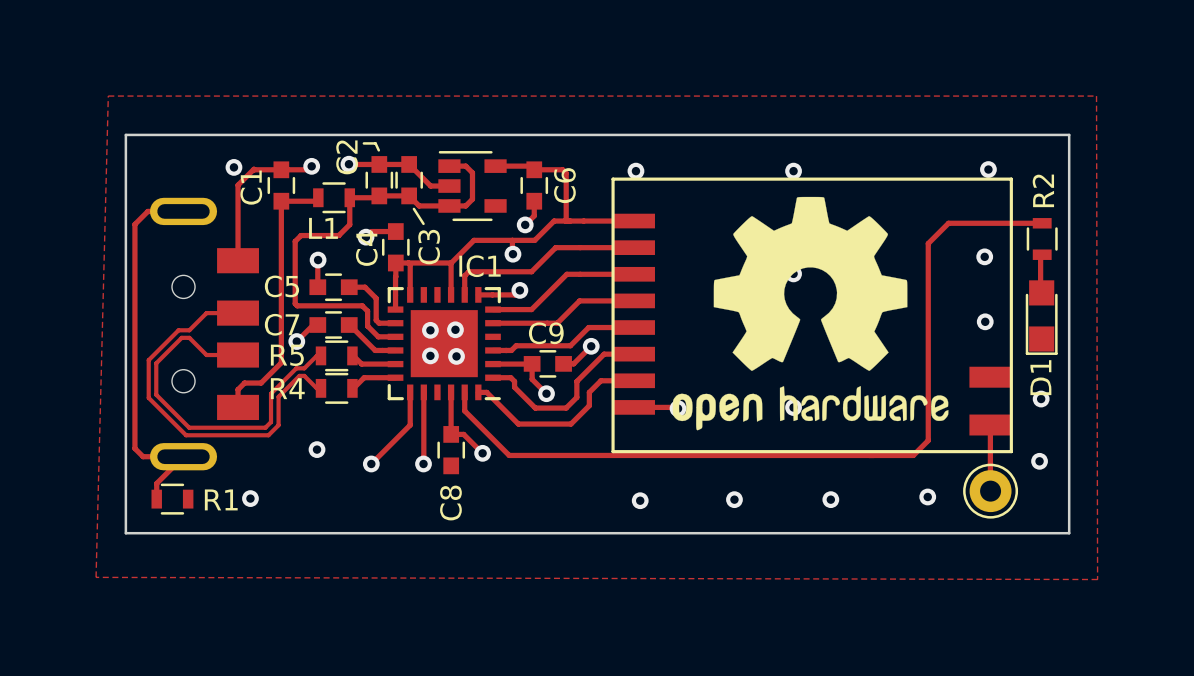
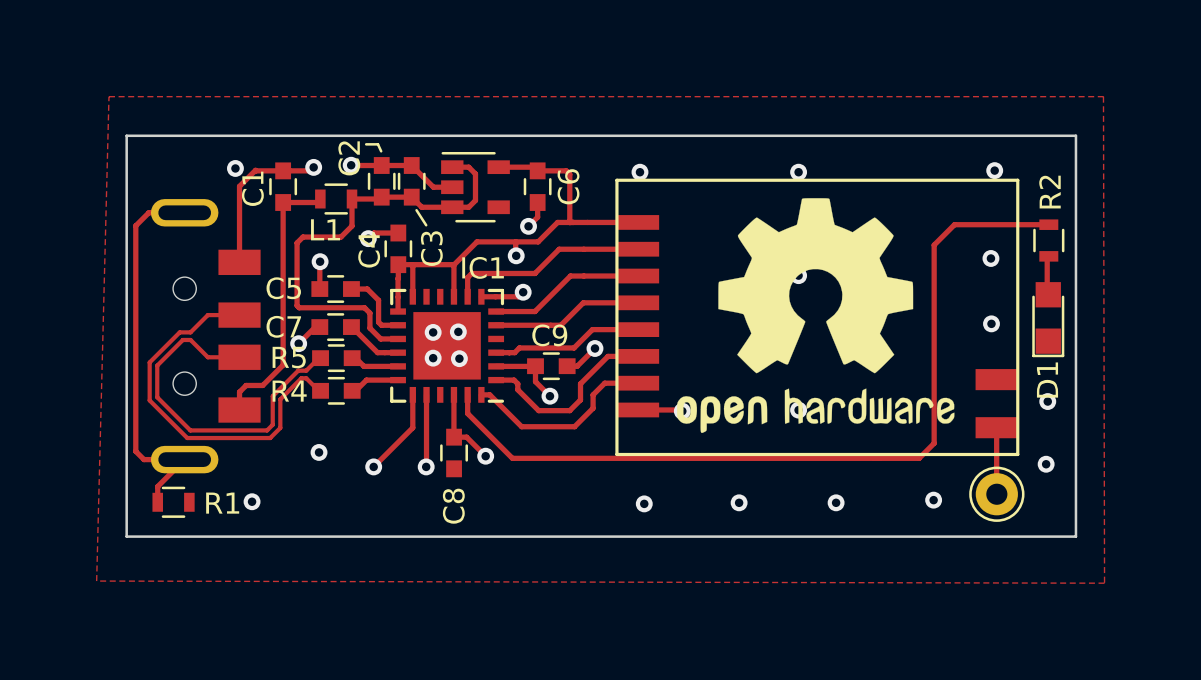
R5 footprint: [315, 340, 358, 372] -> [312, 344, 361, 373]
R4 footprint: [315, 372, 358, 404] -> [312, 376, 361, 405]

